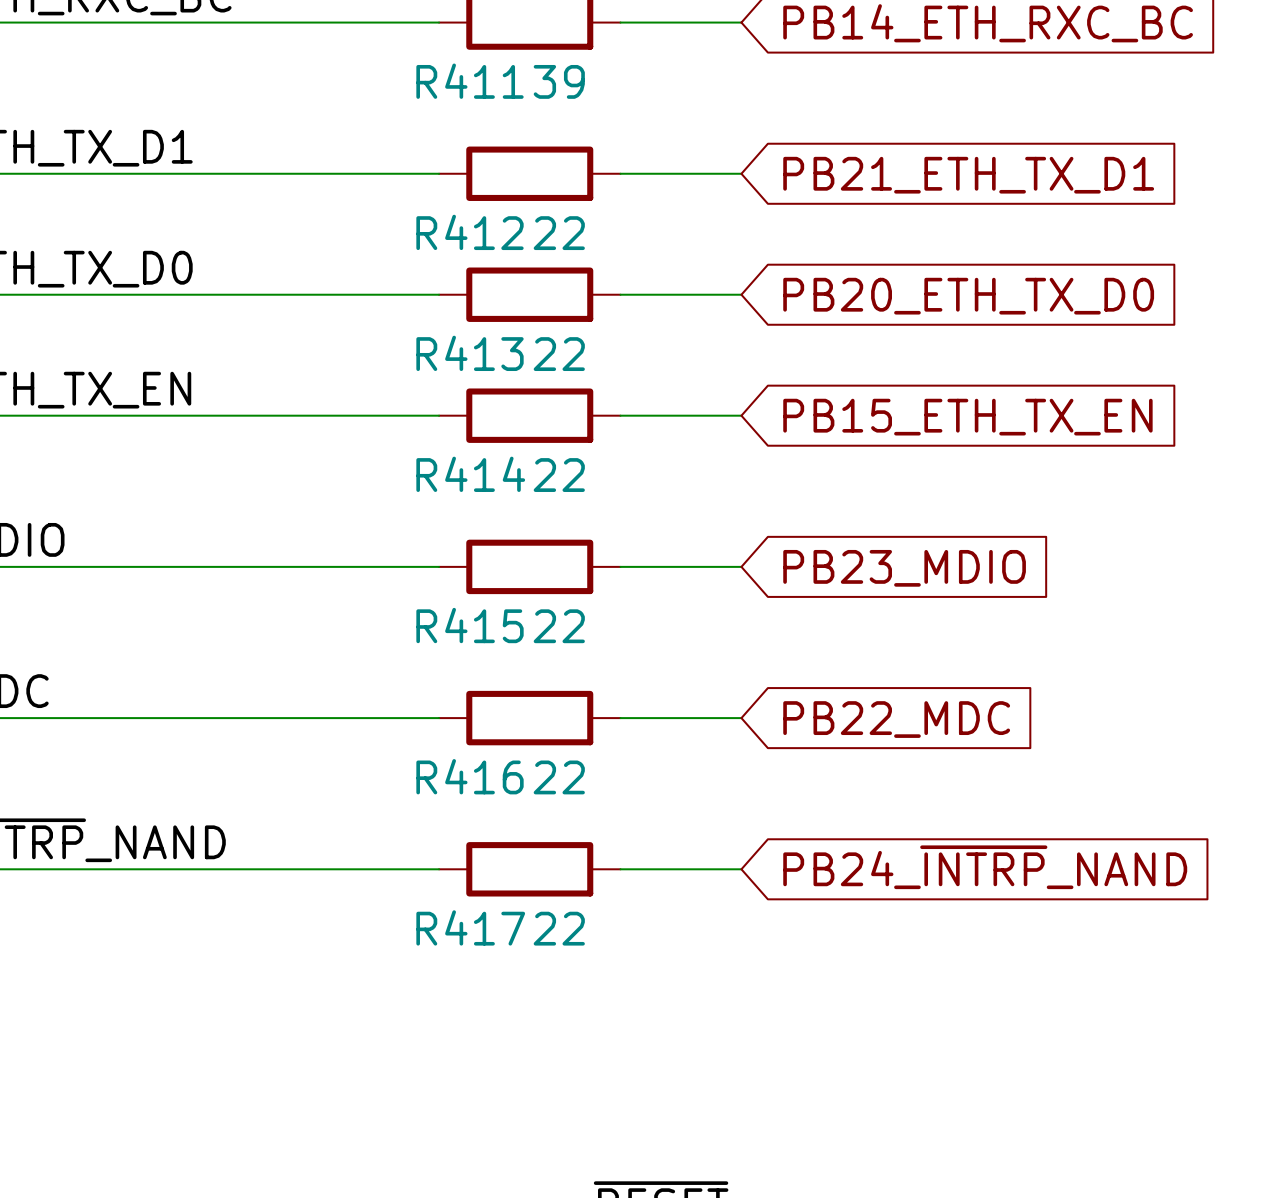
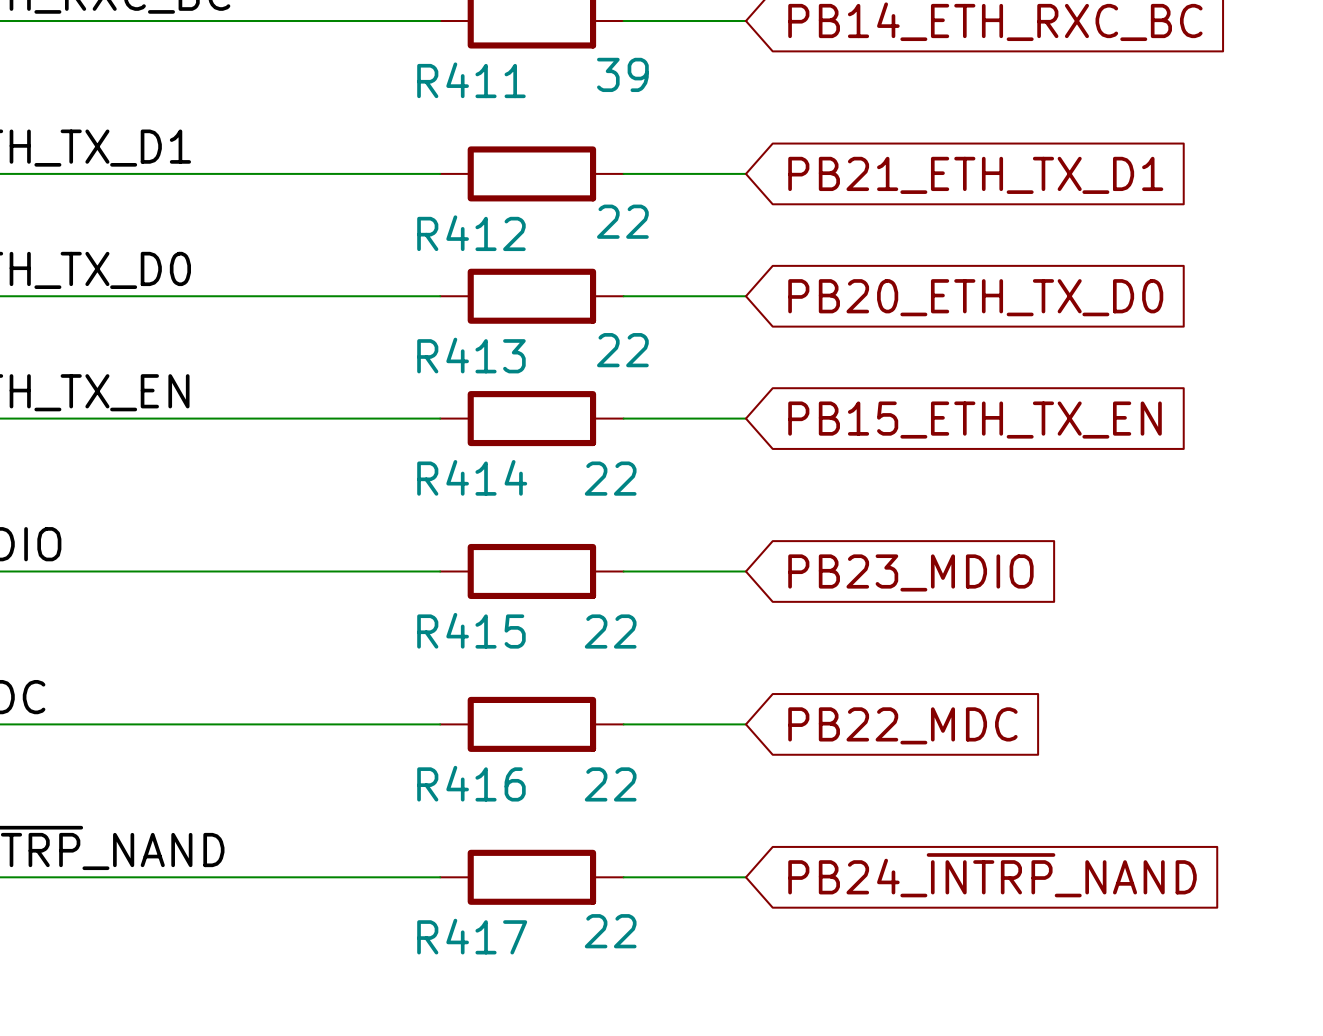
R411 value position: 39 (559, 81) -> 39 (622, 74)
R412 value position: 22 (559, 233) -> 22 (622, 221)
R413 value position: 22 (559, 354) -> 22 (622, 350)
R414 value position: 22 (559, 475) -> 22 (610, 478)
R415 value position: 22 (559, 626) -> 22 (610, 631)
R416 value position: 22 (559, 777) -> 22 (610, 784)
R417 value position: 22 (559, 928) -> 22 (610, 931)

